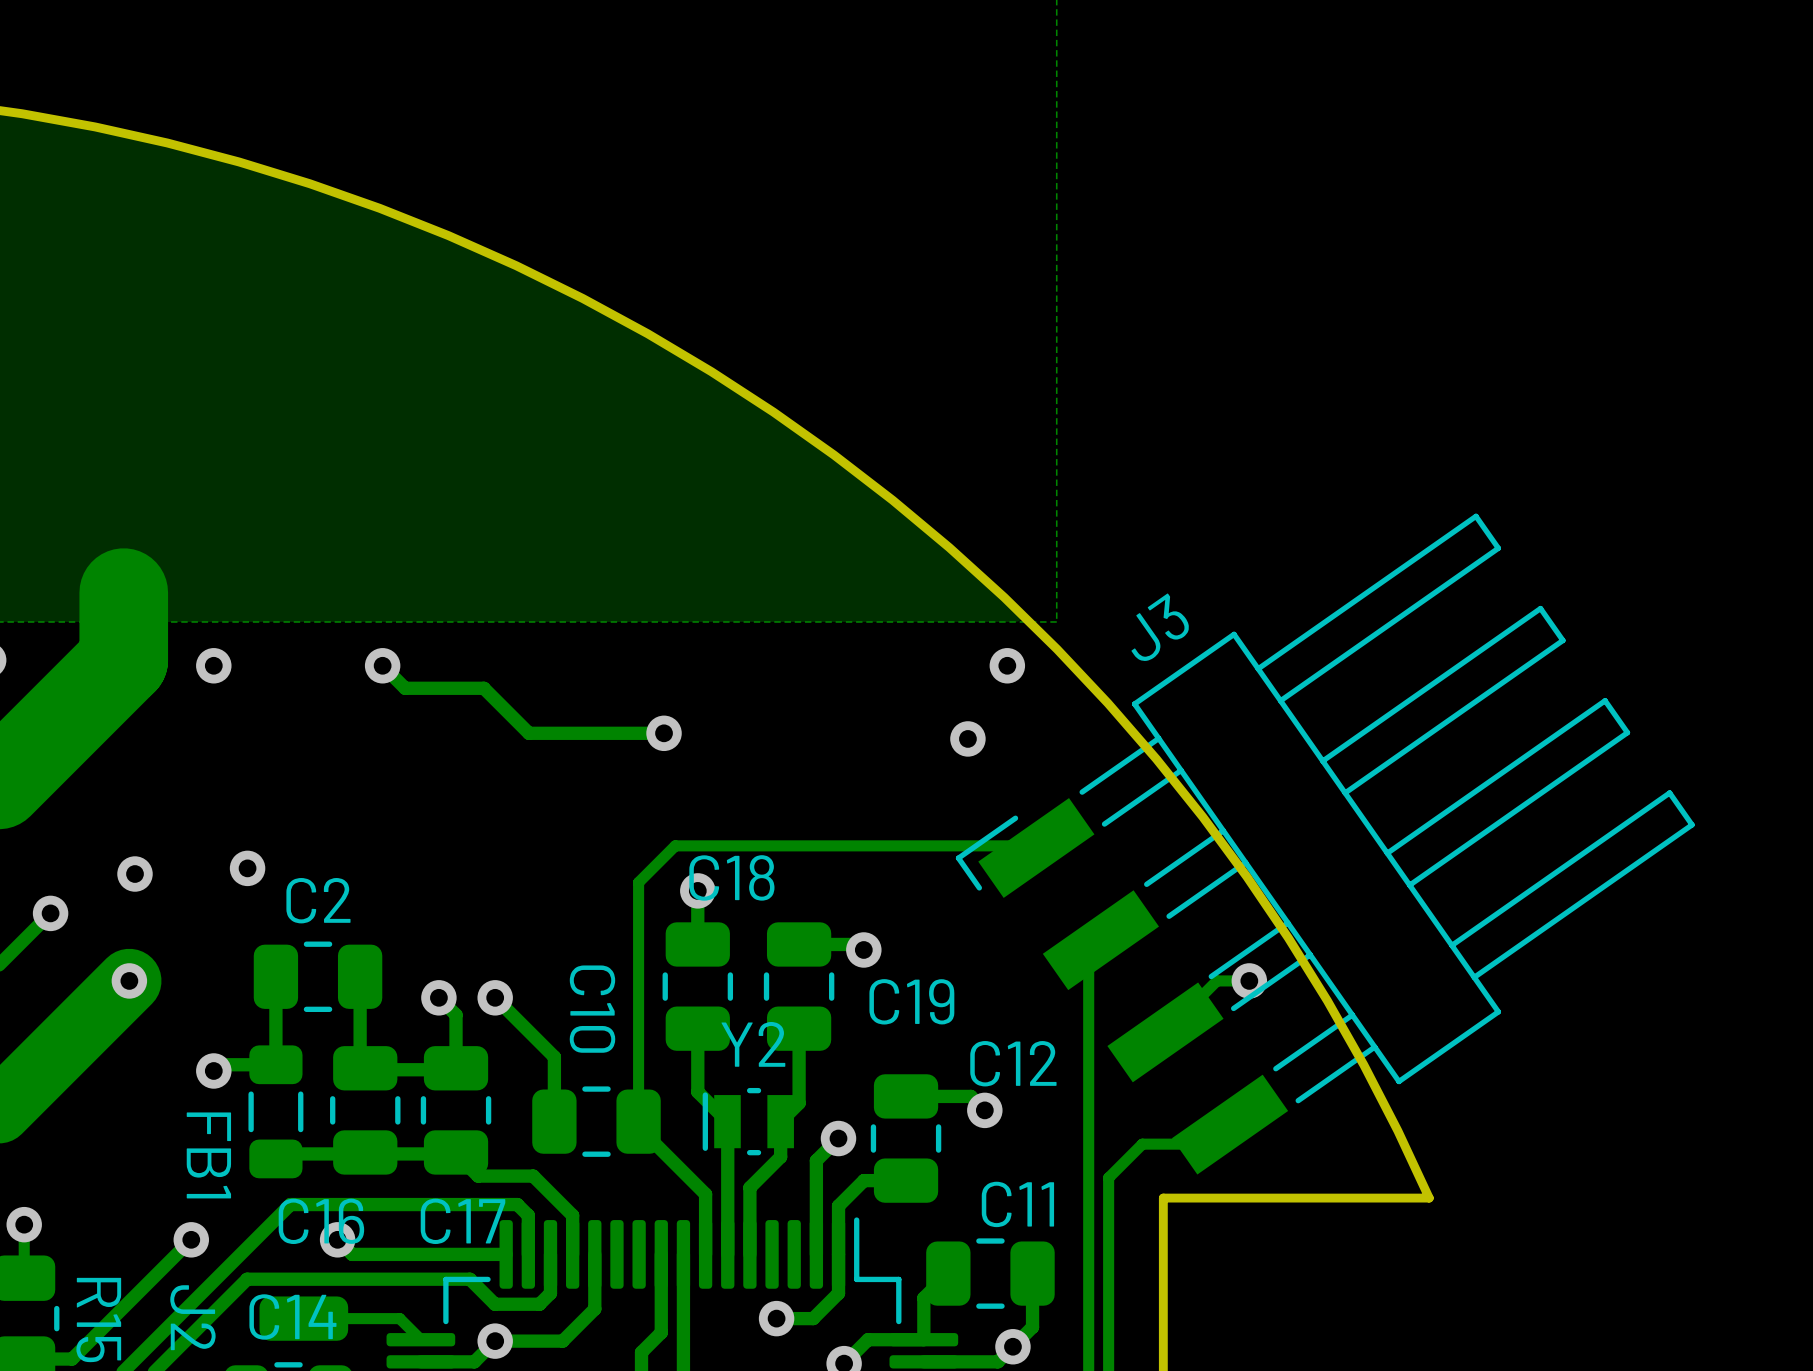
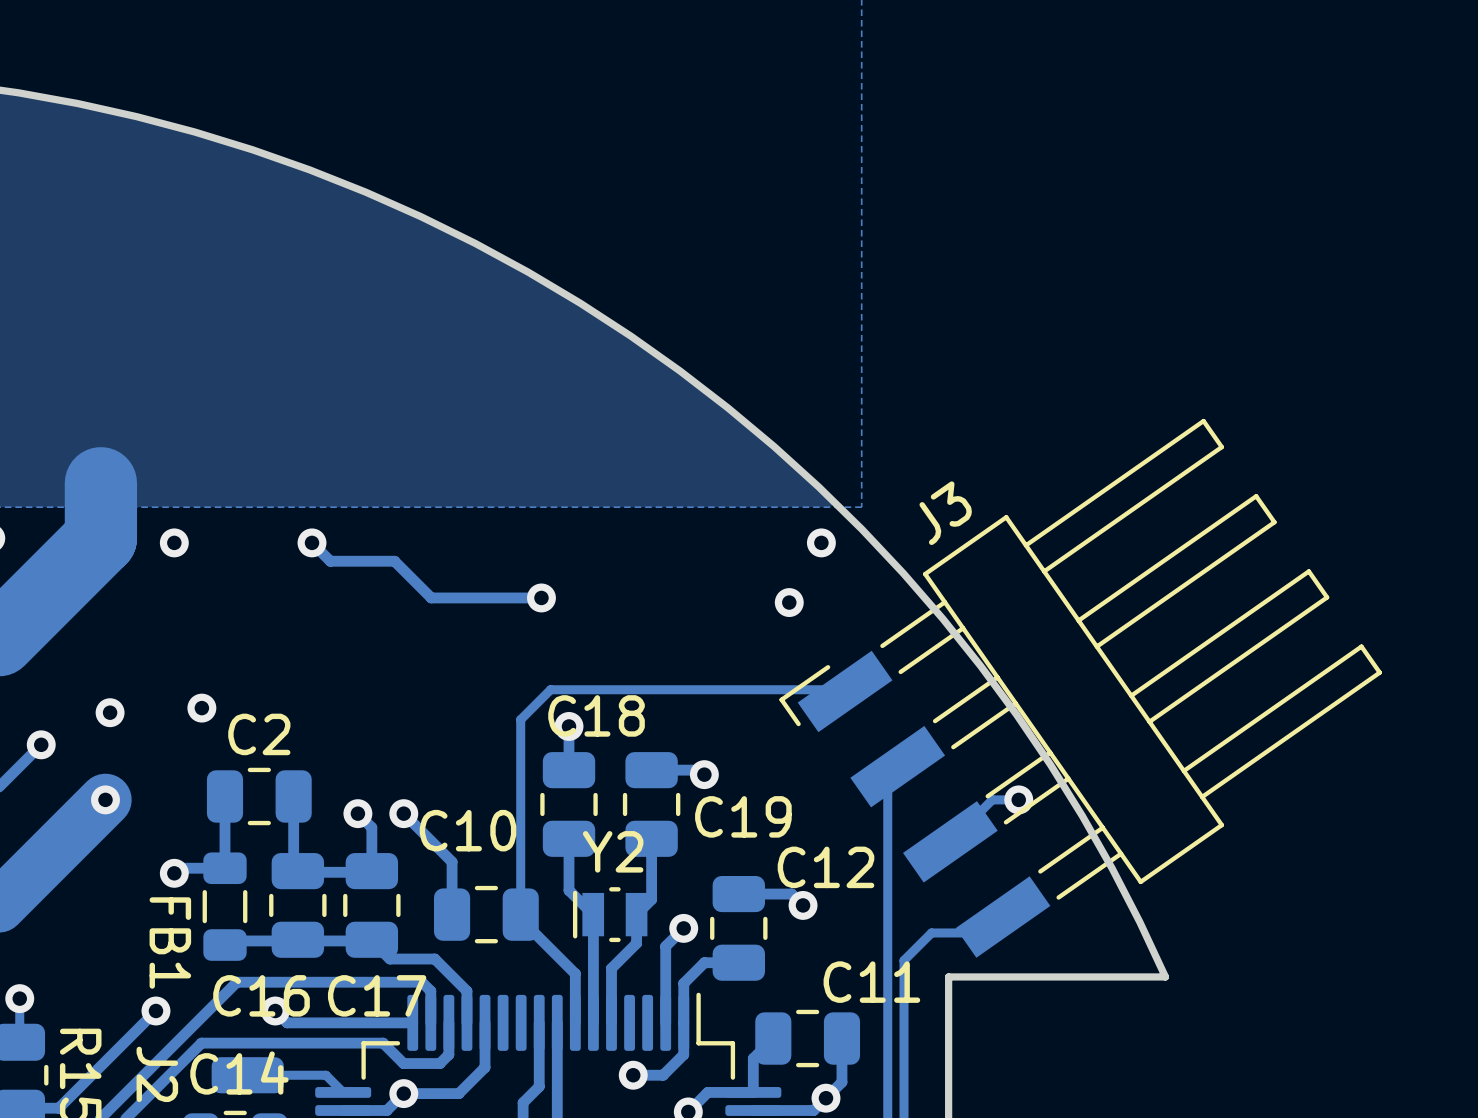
C10 name rotation: 0° (592, 1009) -> 90° counterclockwise (468, 830)
C11 name position: C11 (1017, 1204) -> C11 (871, 982)

